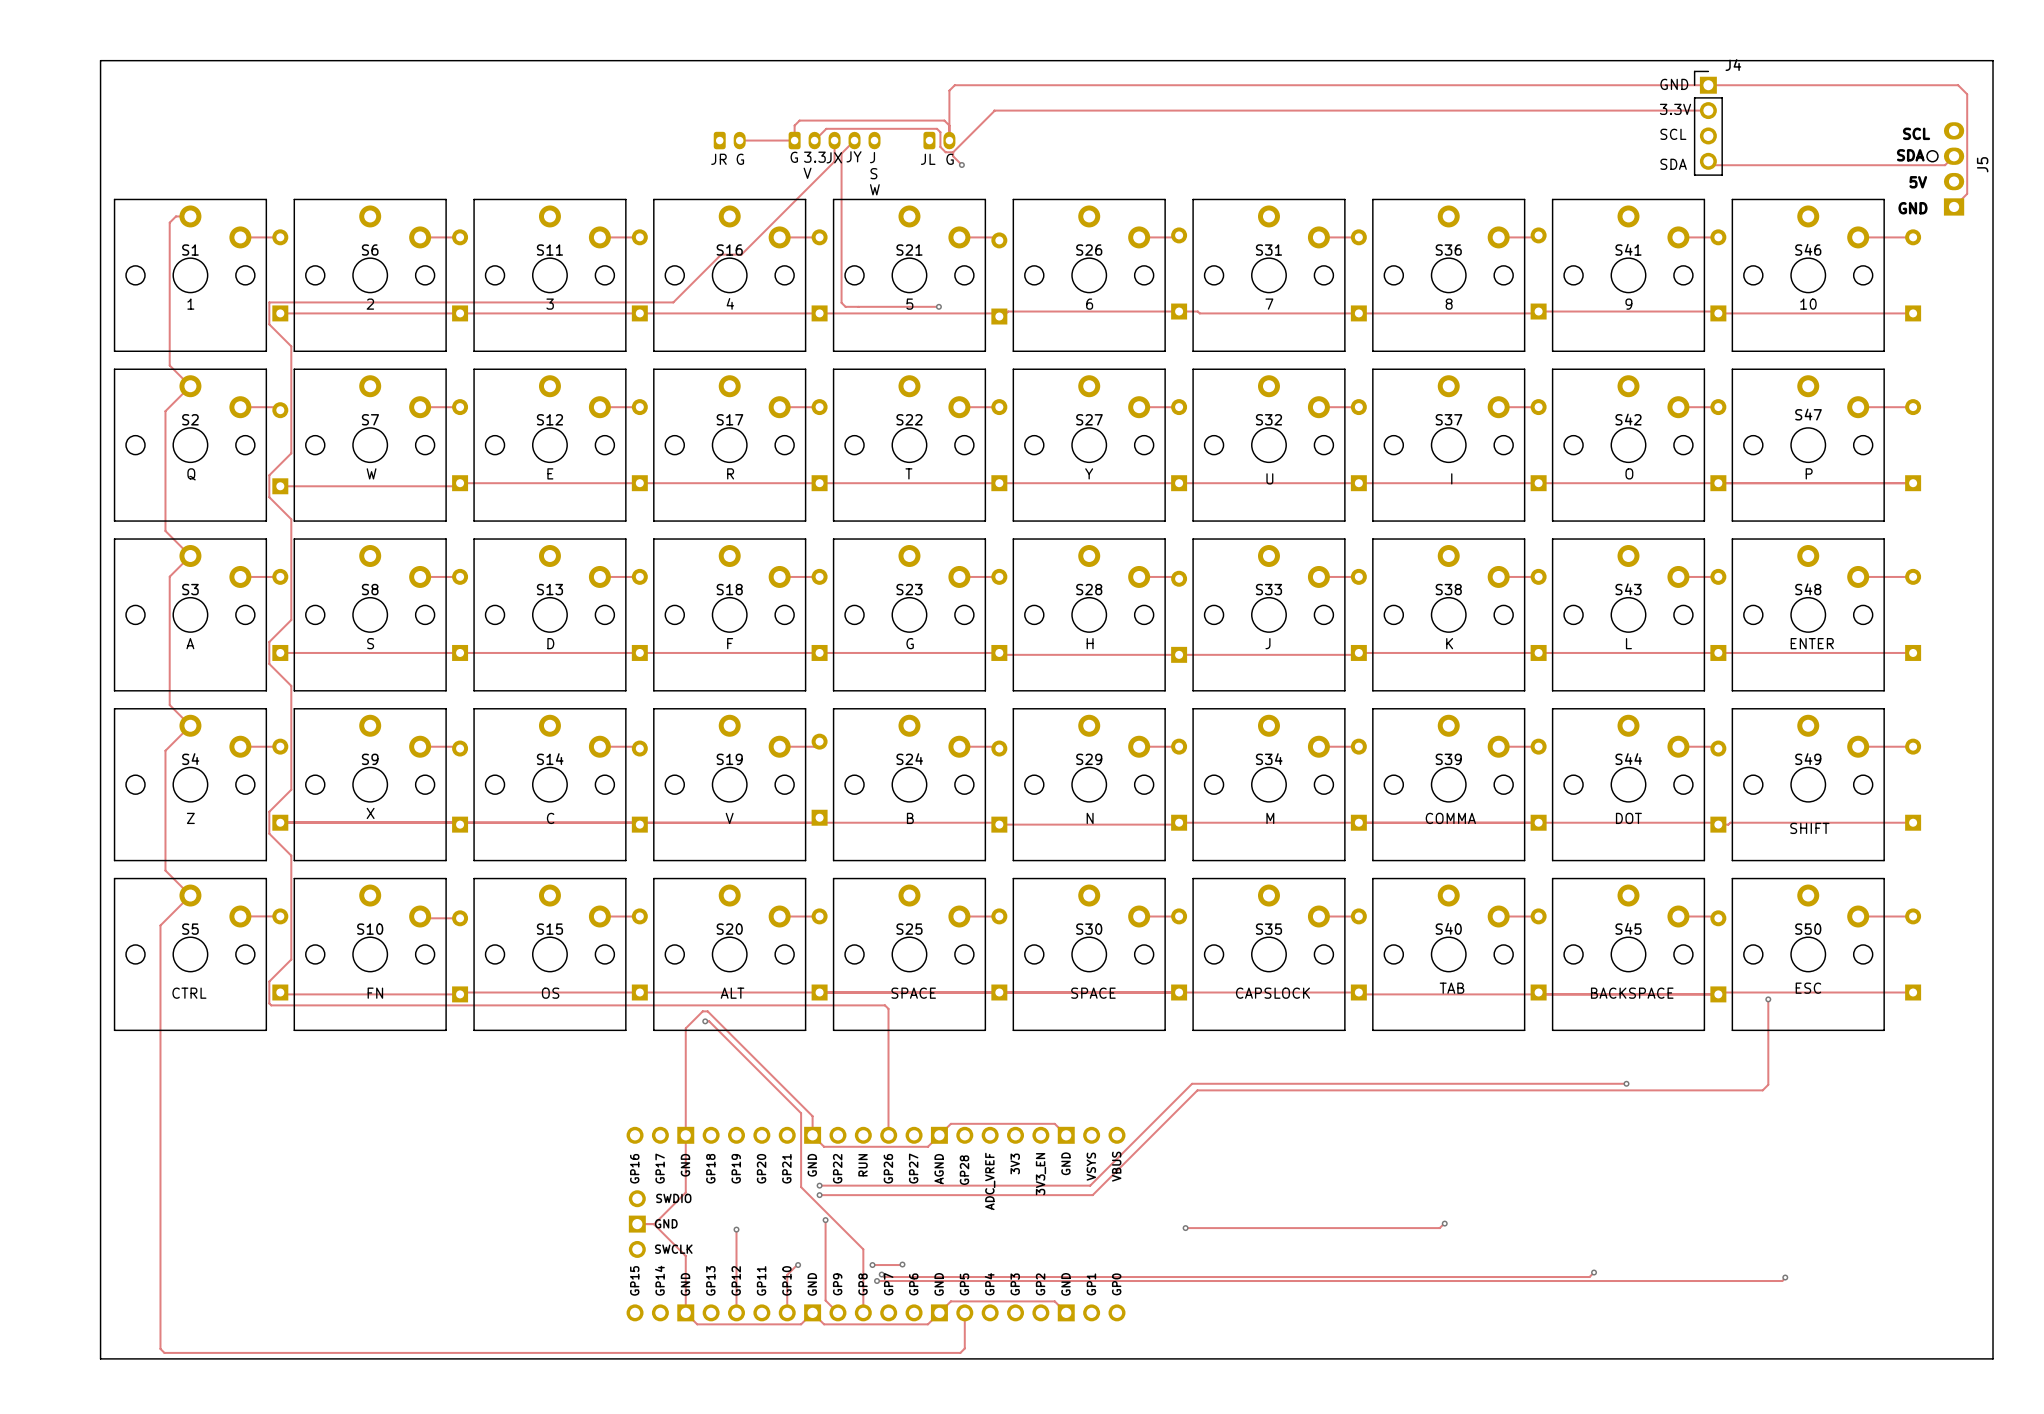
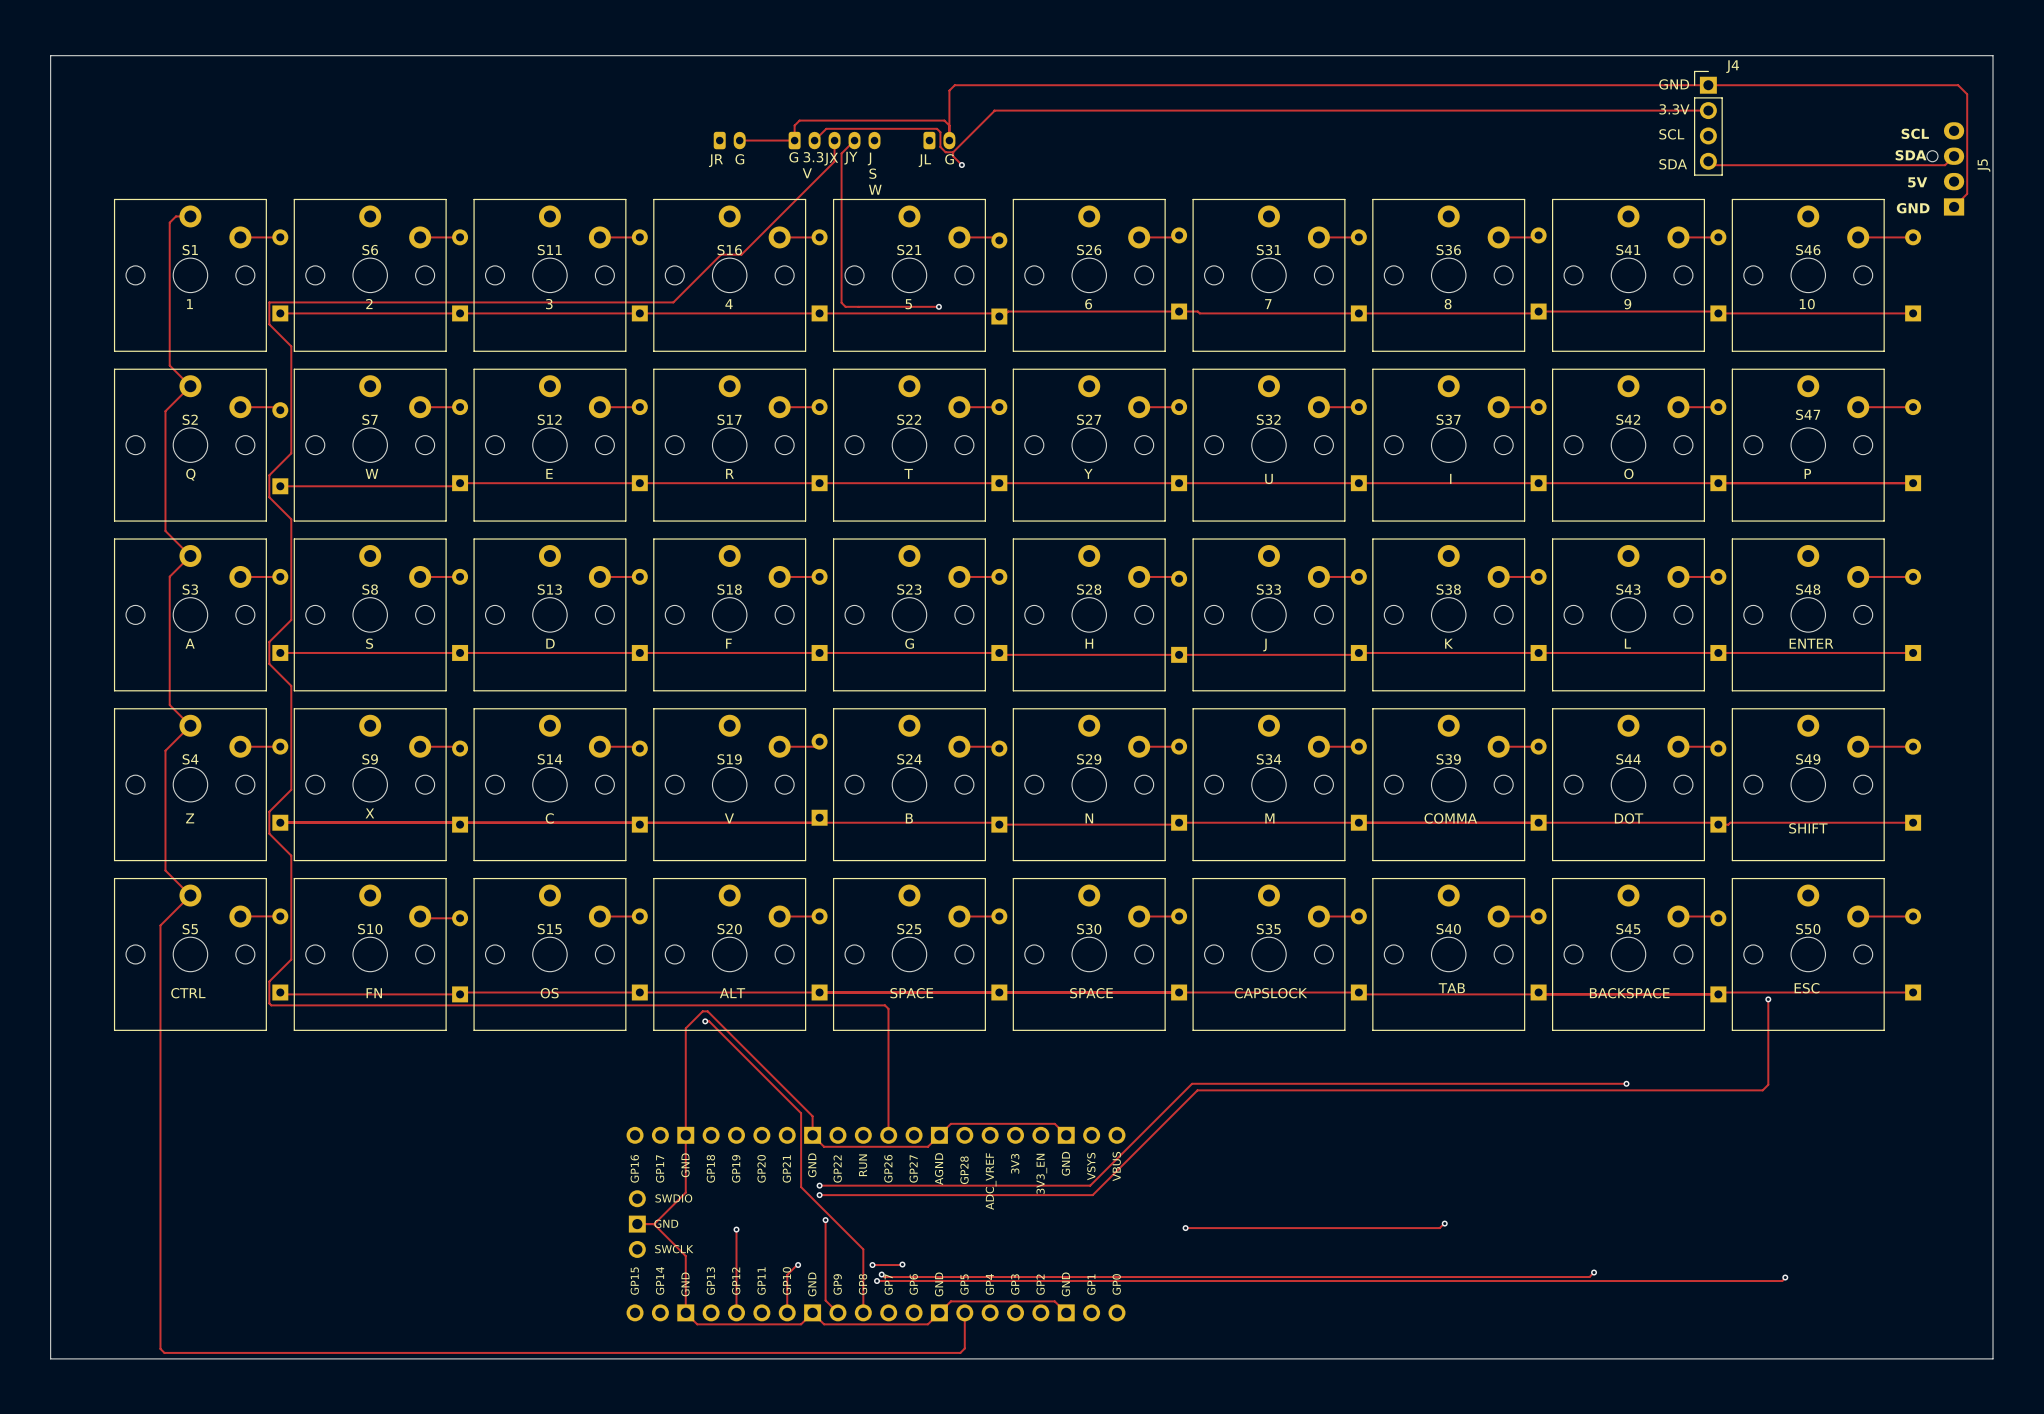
board edge: (1993, 60) (100, 60) (100, 1358) -> (1993, 60) (1993, 55) (50, 55) (50, 1358) (100, 1358)

